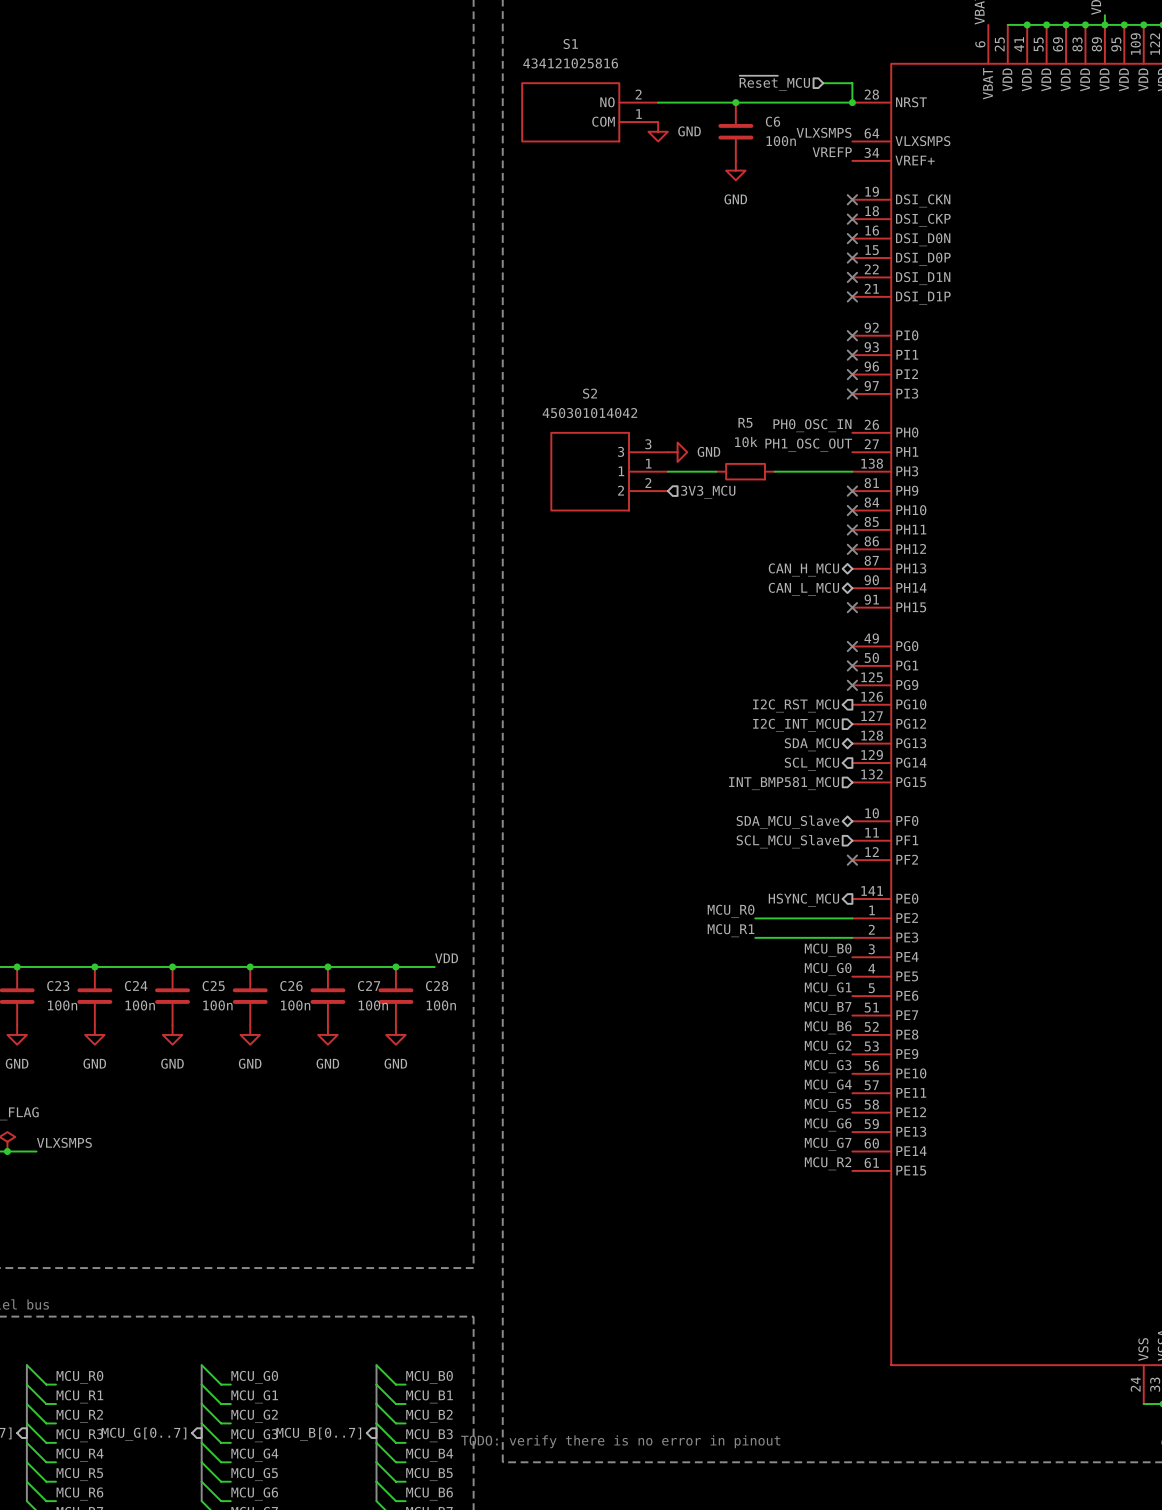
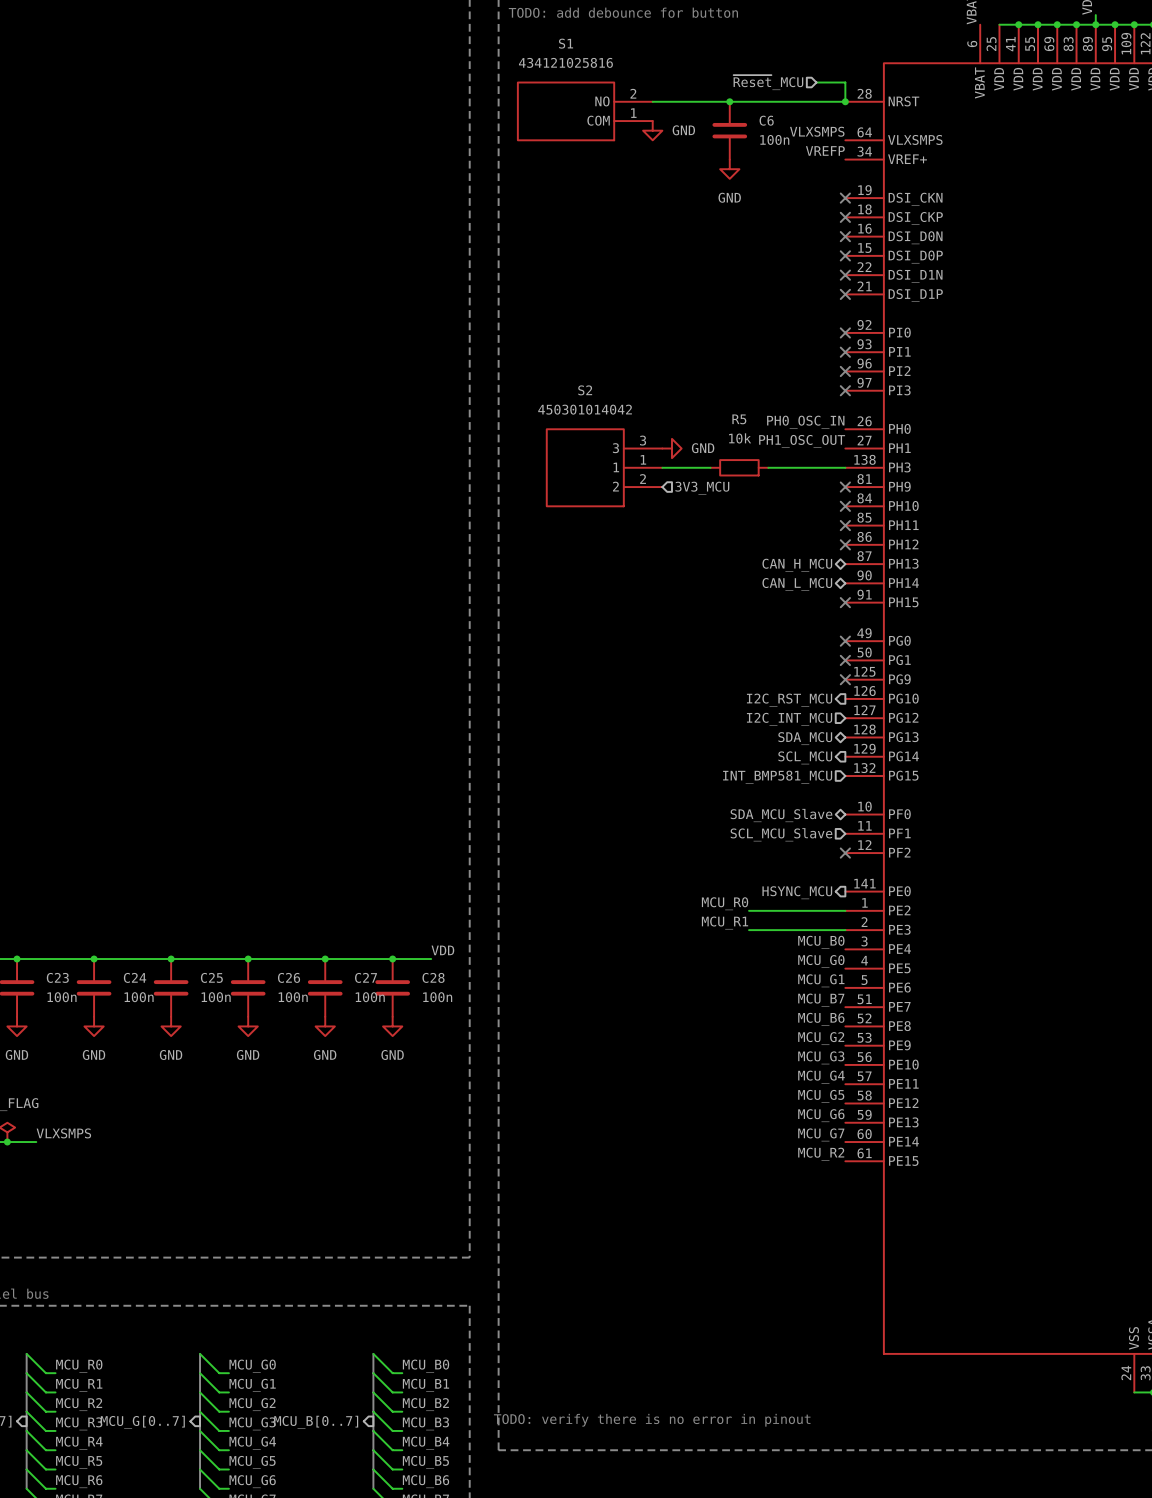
text: none -> TODO: add debounce for button (623, 12)
text position: TODO: verify there is no error in pinout (620, 1441) -> TODO: verify there is no error in pinout (652, 1420)

